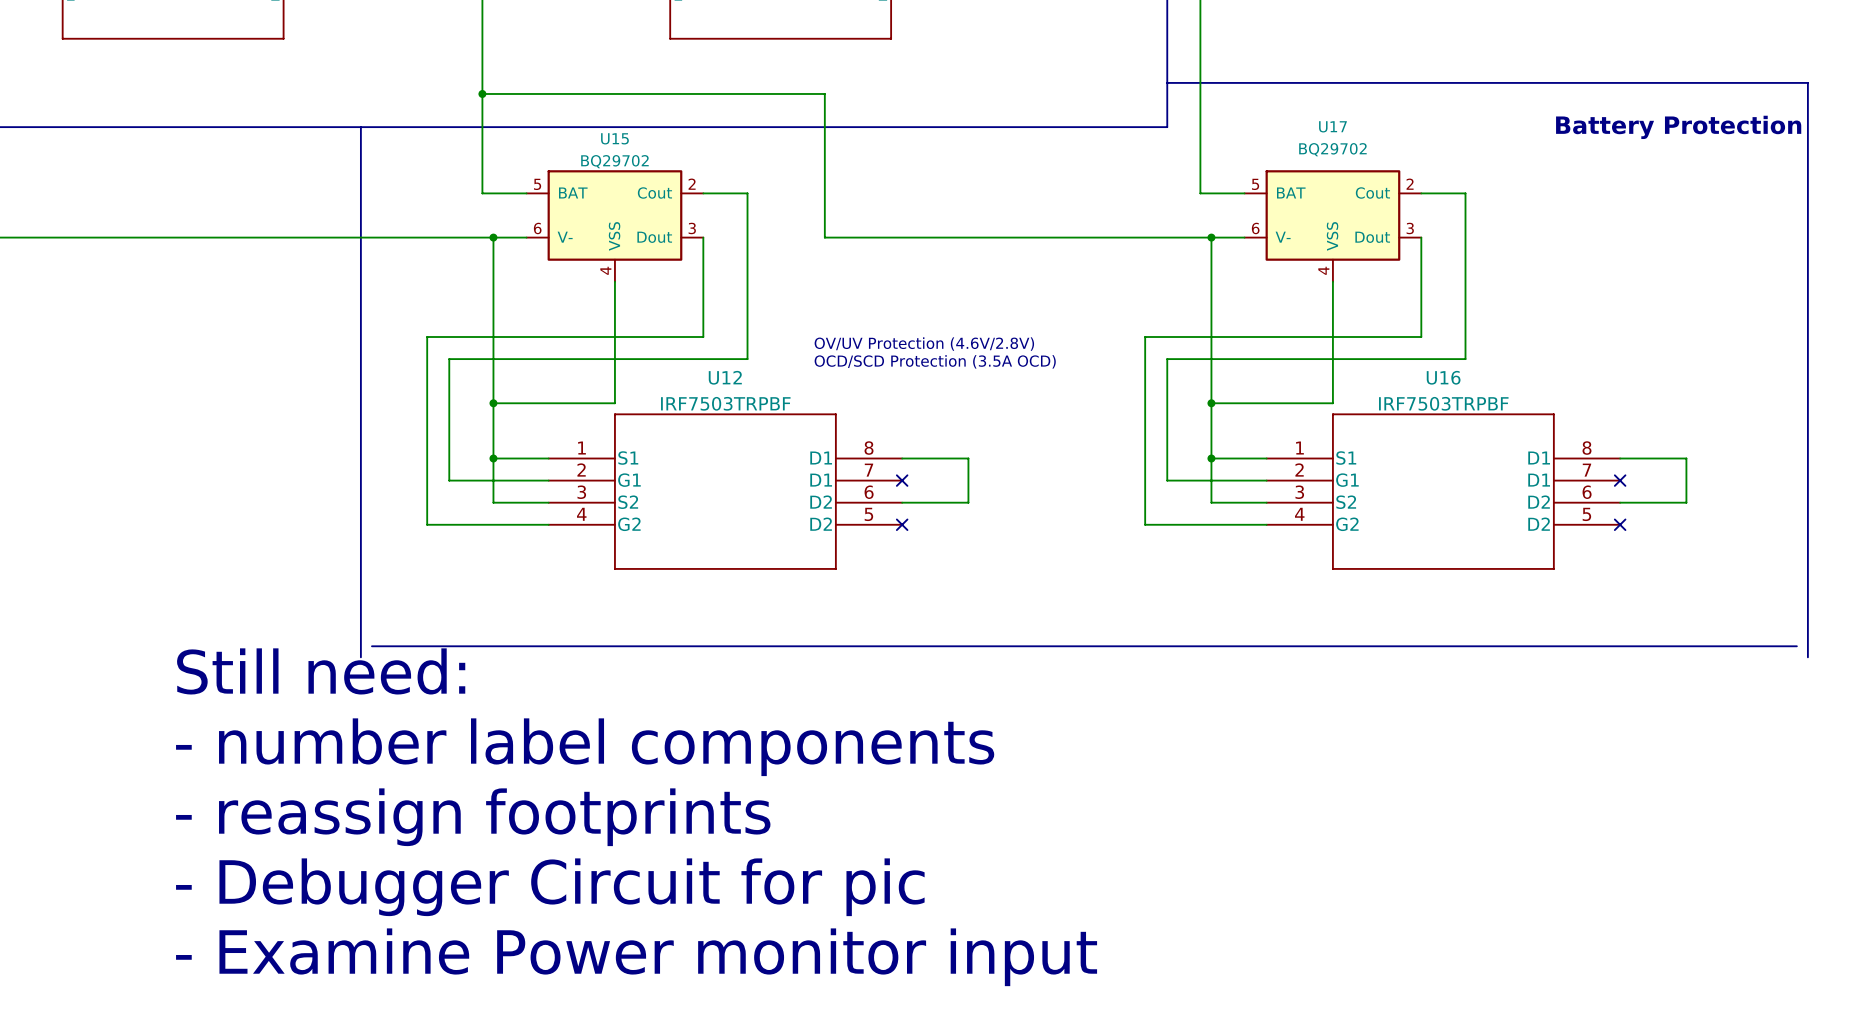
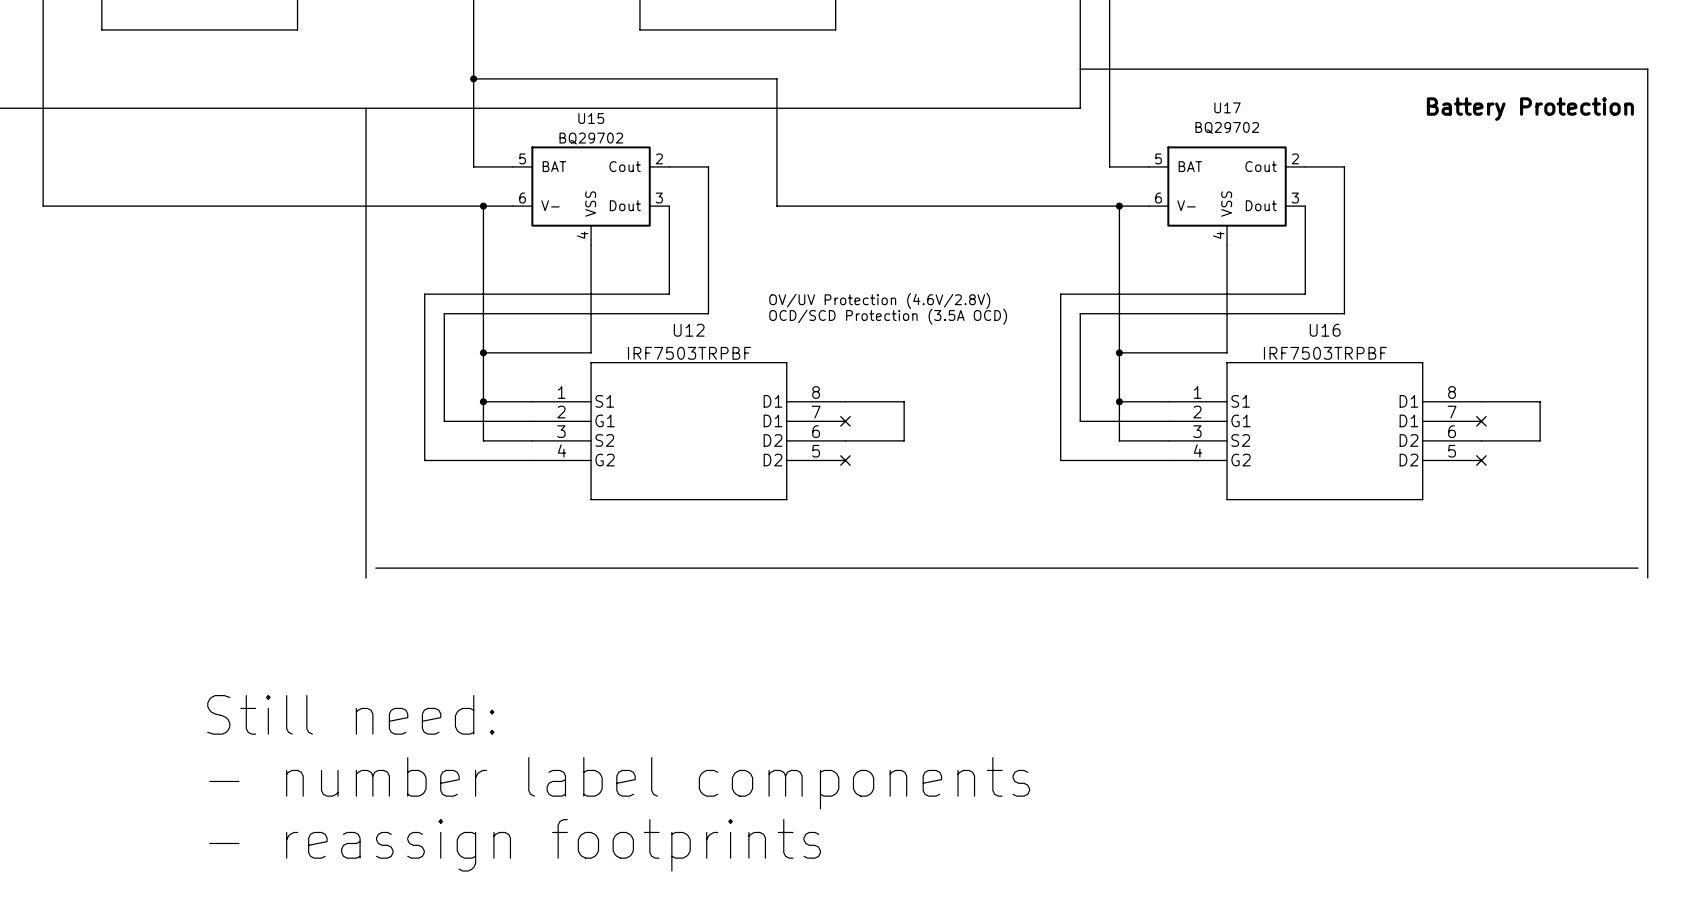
text: Still need: (321, 671) -> none
text: - number label components (585, 747) -> none
text: - reassign footprints (473, 817) -> Still need: (350, 714)
text: - Debugger Circuit for pic (550, 887) -> - number label components (619, 783)
text: - Examine Power monitor input (636, 957) -> - reassign footprints (515, 845)

